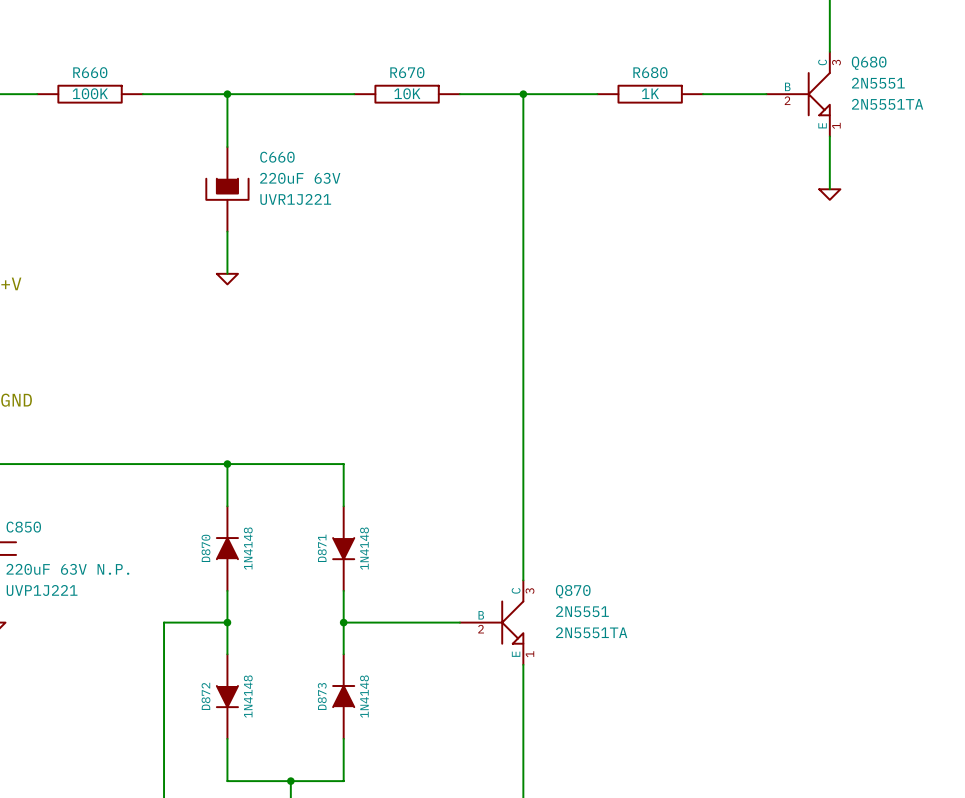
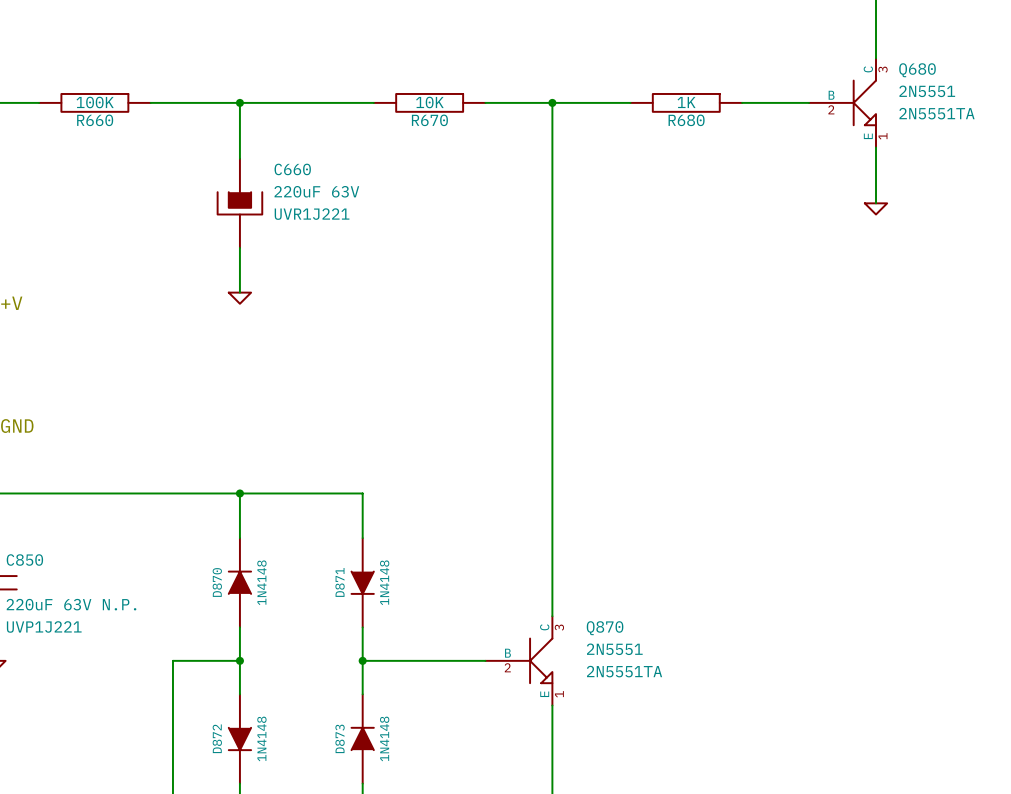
R660 name position: R660 (90, 72) -> R660 (95, 120)
R670 name position: R670 (407, 72) -> R670 (429, 120)
R680 name position: R680 (650, 72) -> R680 (686, 120)

